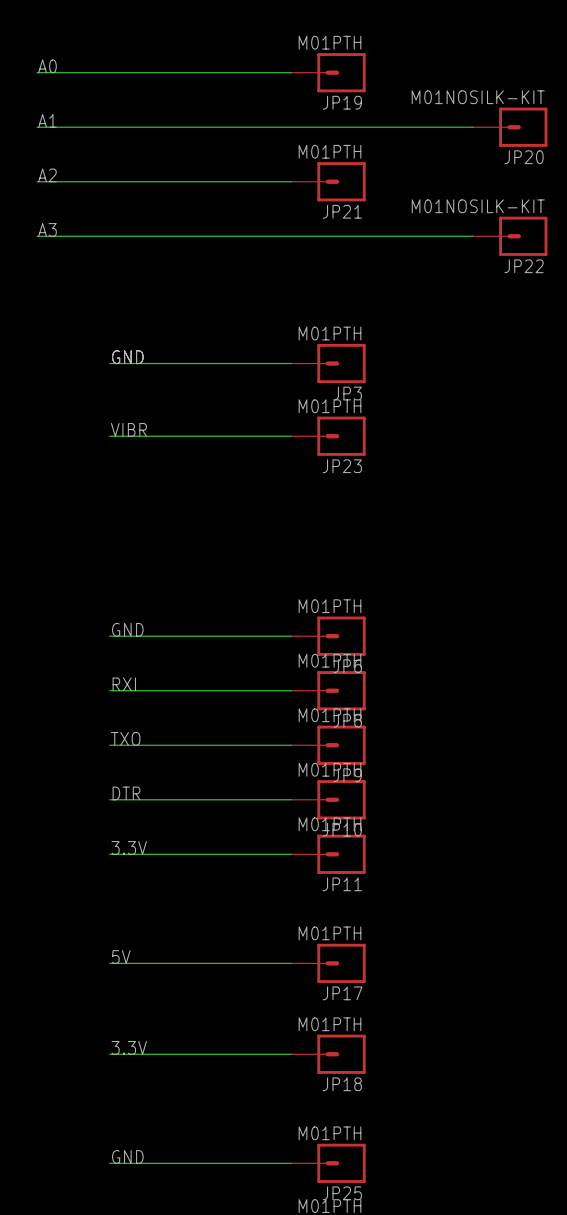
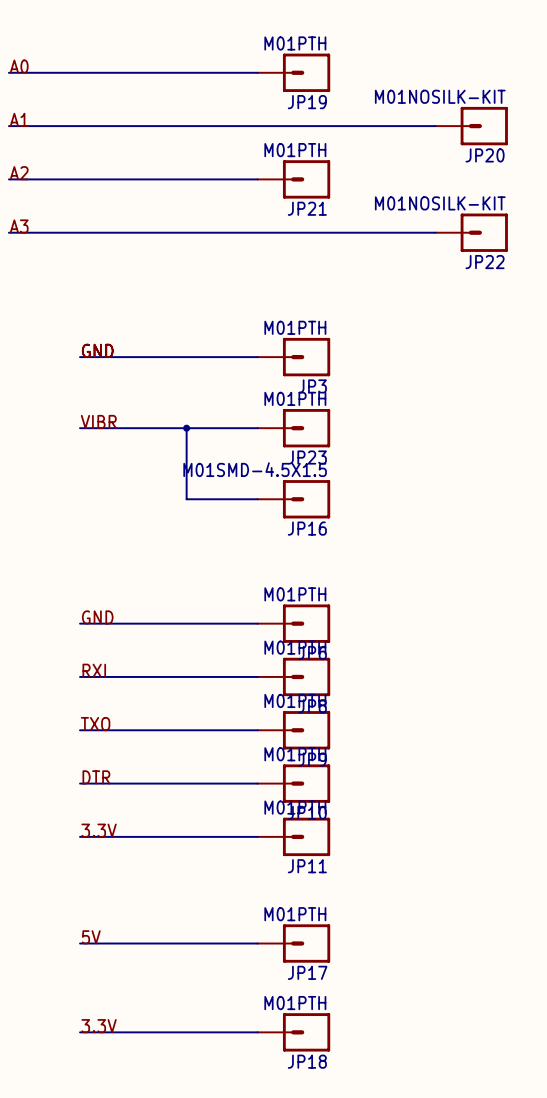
wire: none -> (186, 428) (186, 499) (257, 499)
junction: none -> (186, 428)
JP16: none -> M01SMD-4.5X1.5 (293, 499)

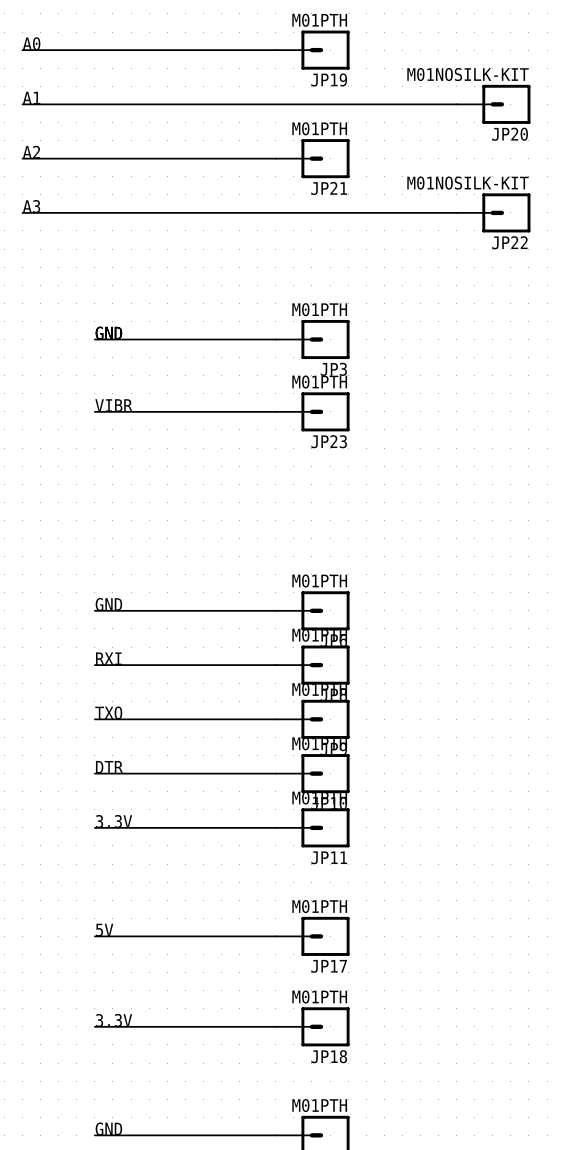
wire: (186, 428) (186, 499) (257, 499) -> none
junction: (186, 428) -> none
JP16: M01SMD-4.5X1.5 (293, 499) -> none

